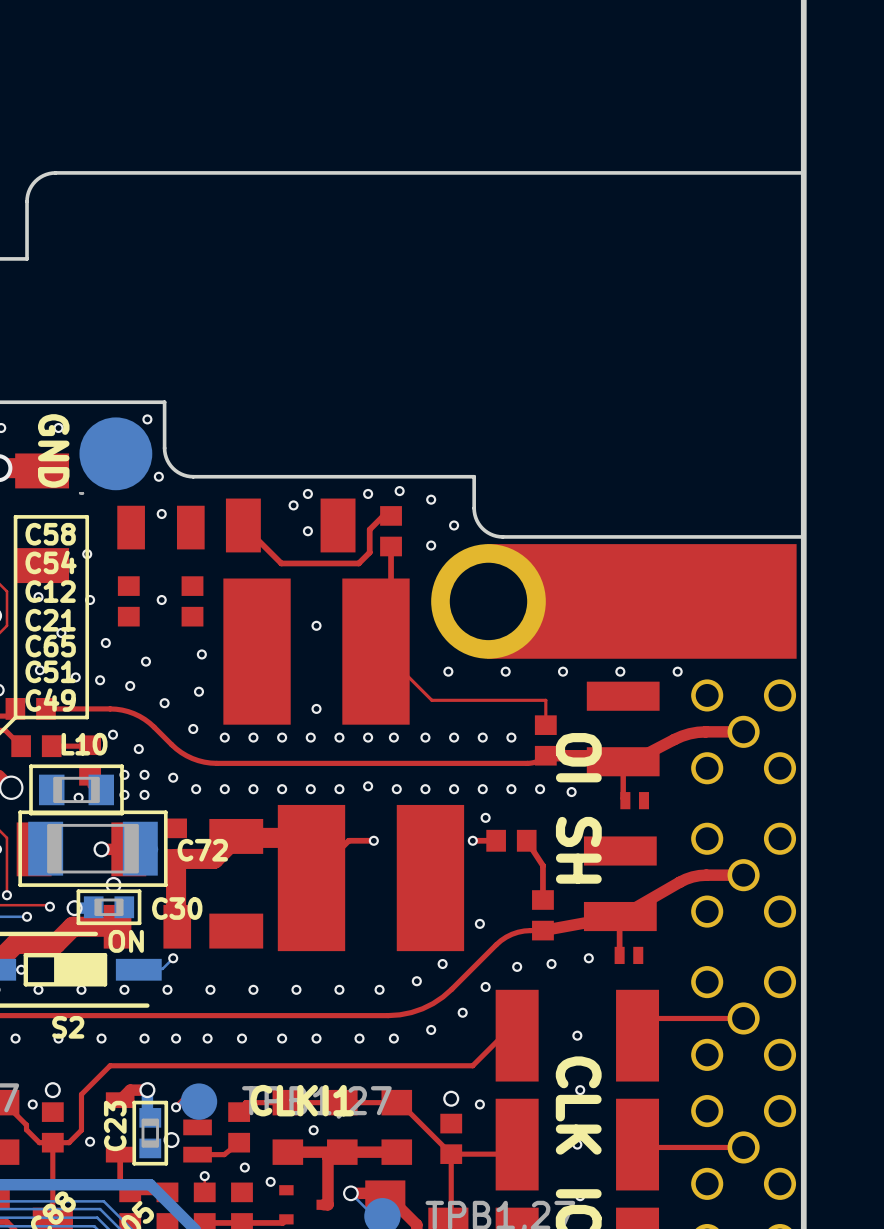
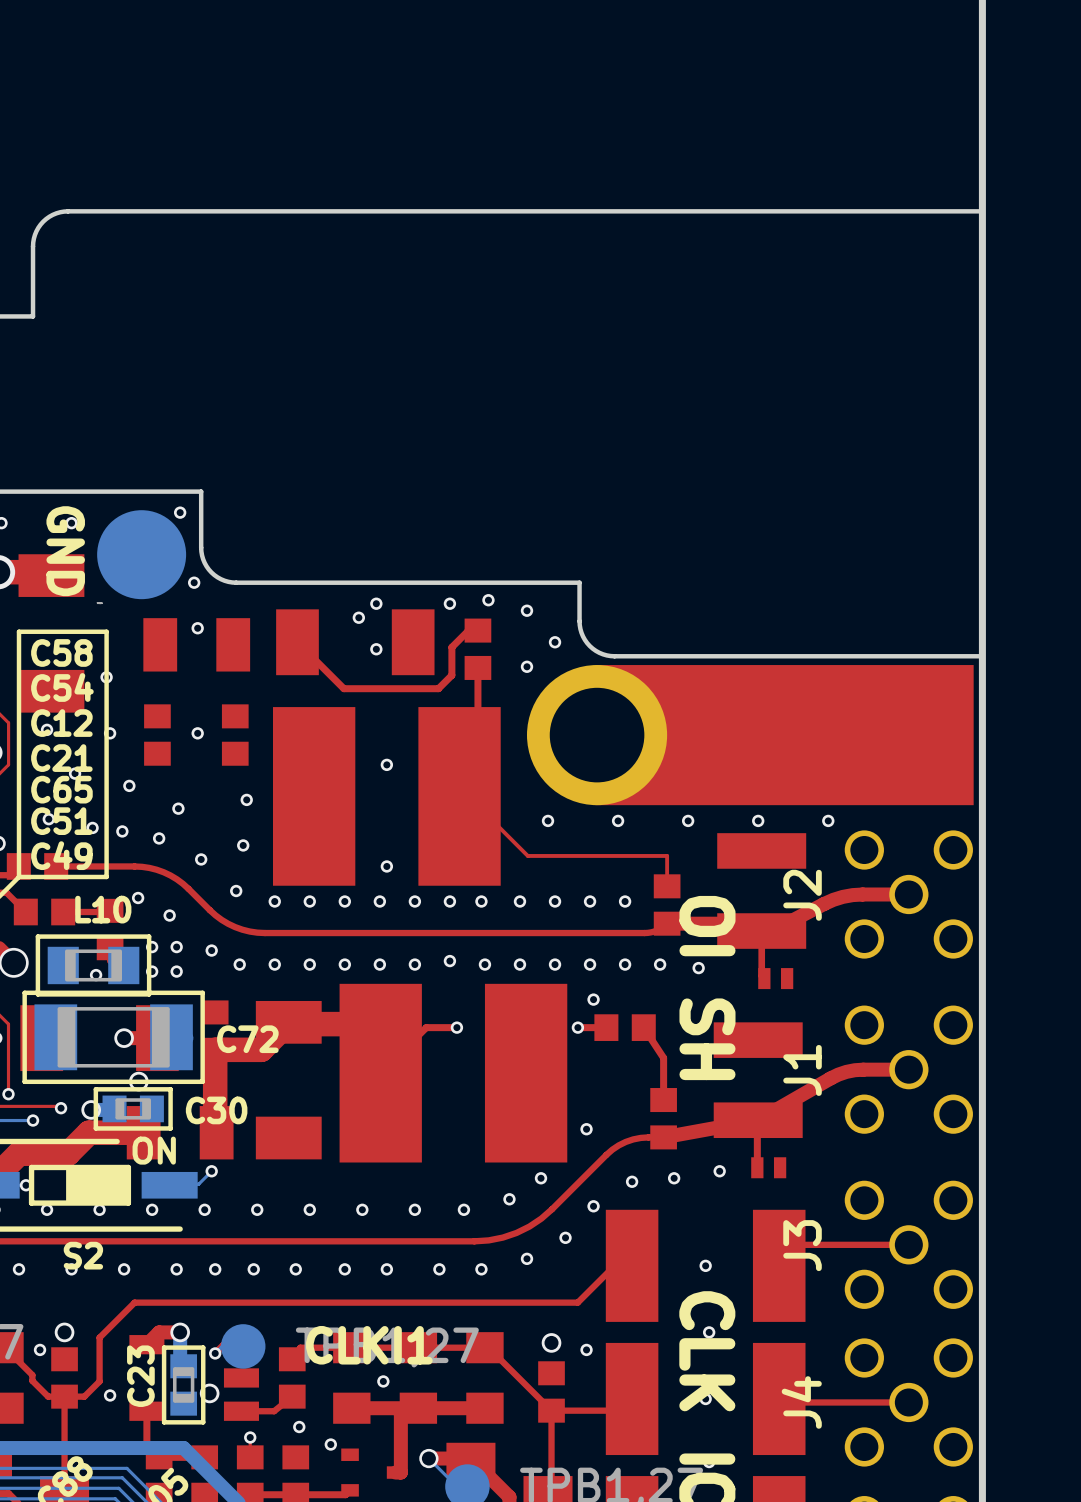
J2 name: none -> J2 (802, 895)
J1 name: none -> J1 (802, 1070)
J3 name: none -> J3 (802, 1245)
J4 name: none -> J4 (801, 1402)

